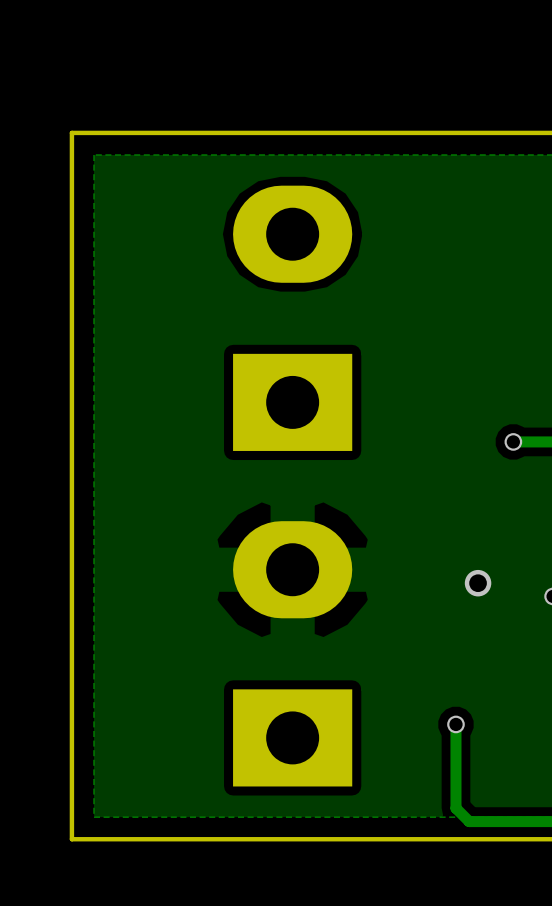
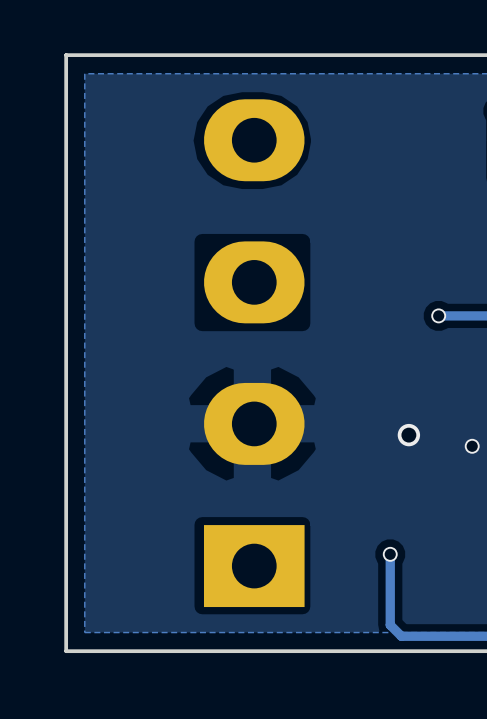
part: (292, 318) -> none
part: none -> (254, 353)
part: (292, 653) -> none

